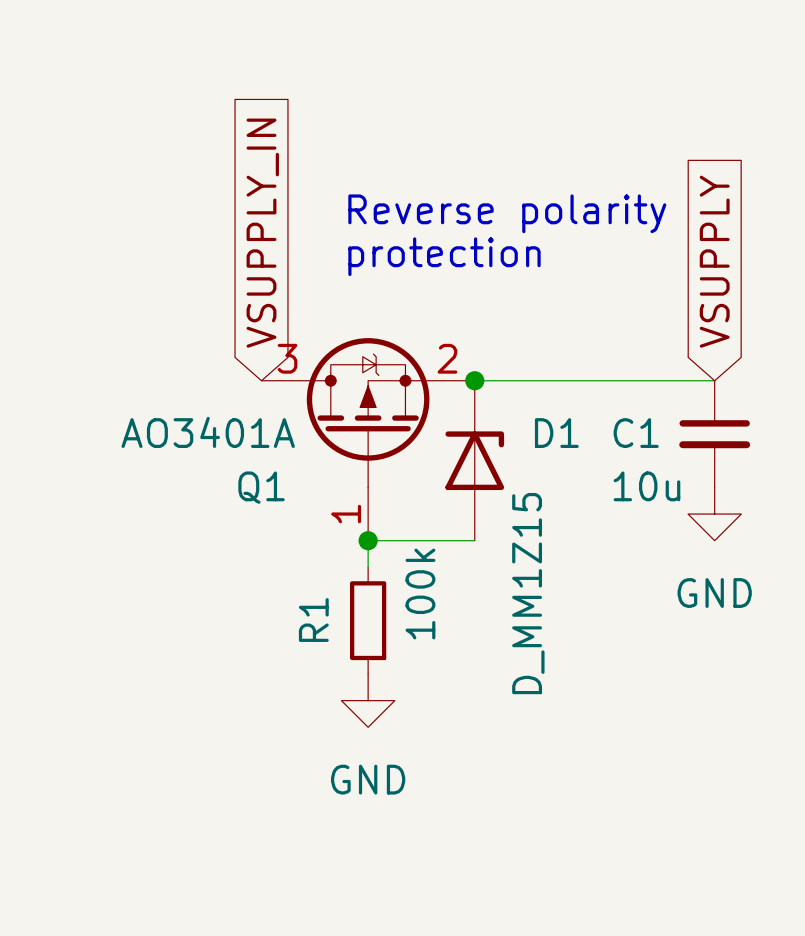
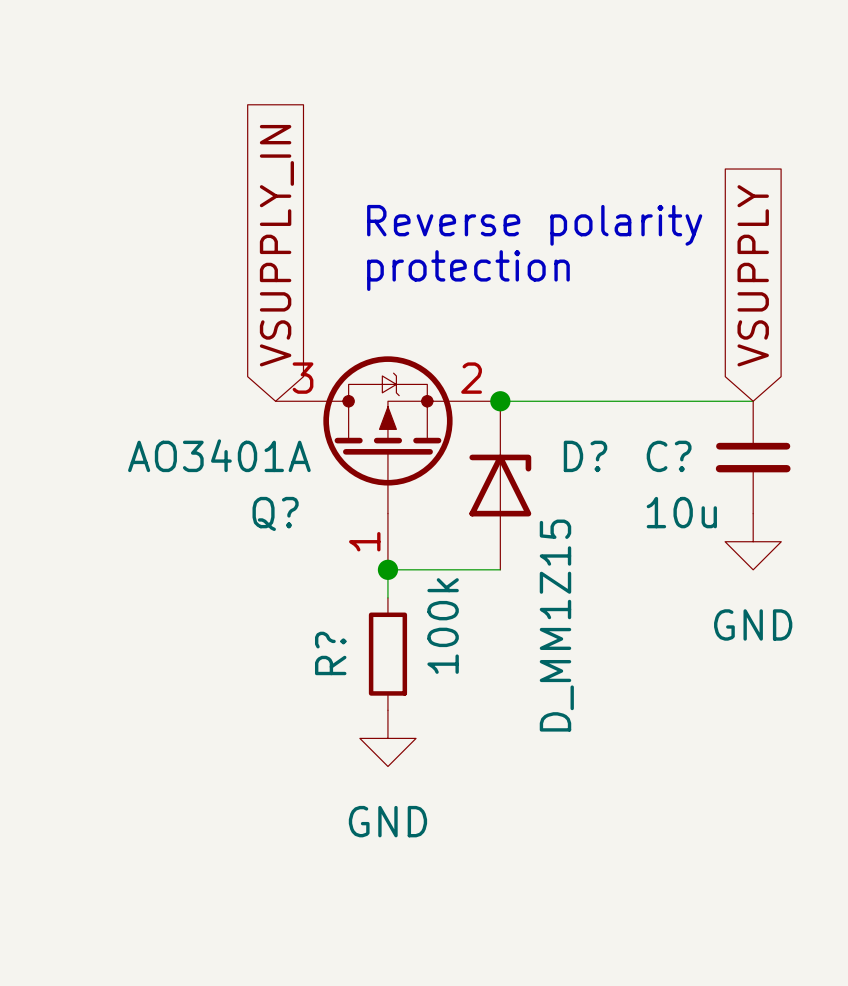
D1 name: D1 (556, 433) -> D? (585, 456)
C1 name: C1 (636, 433) -> C? (669, 456)
Q1 name: Q1 (261, 487) -> Q? (275, 513)
R1 name: R1 (313, 620) -> R? (330, 653)

